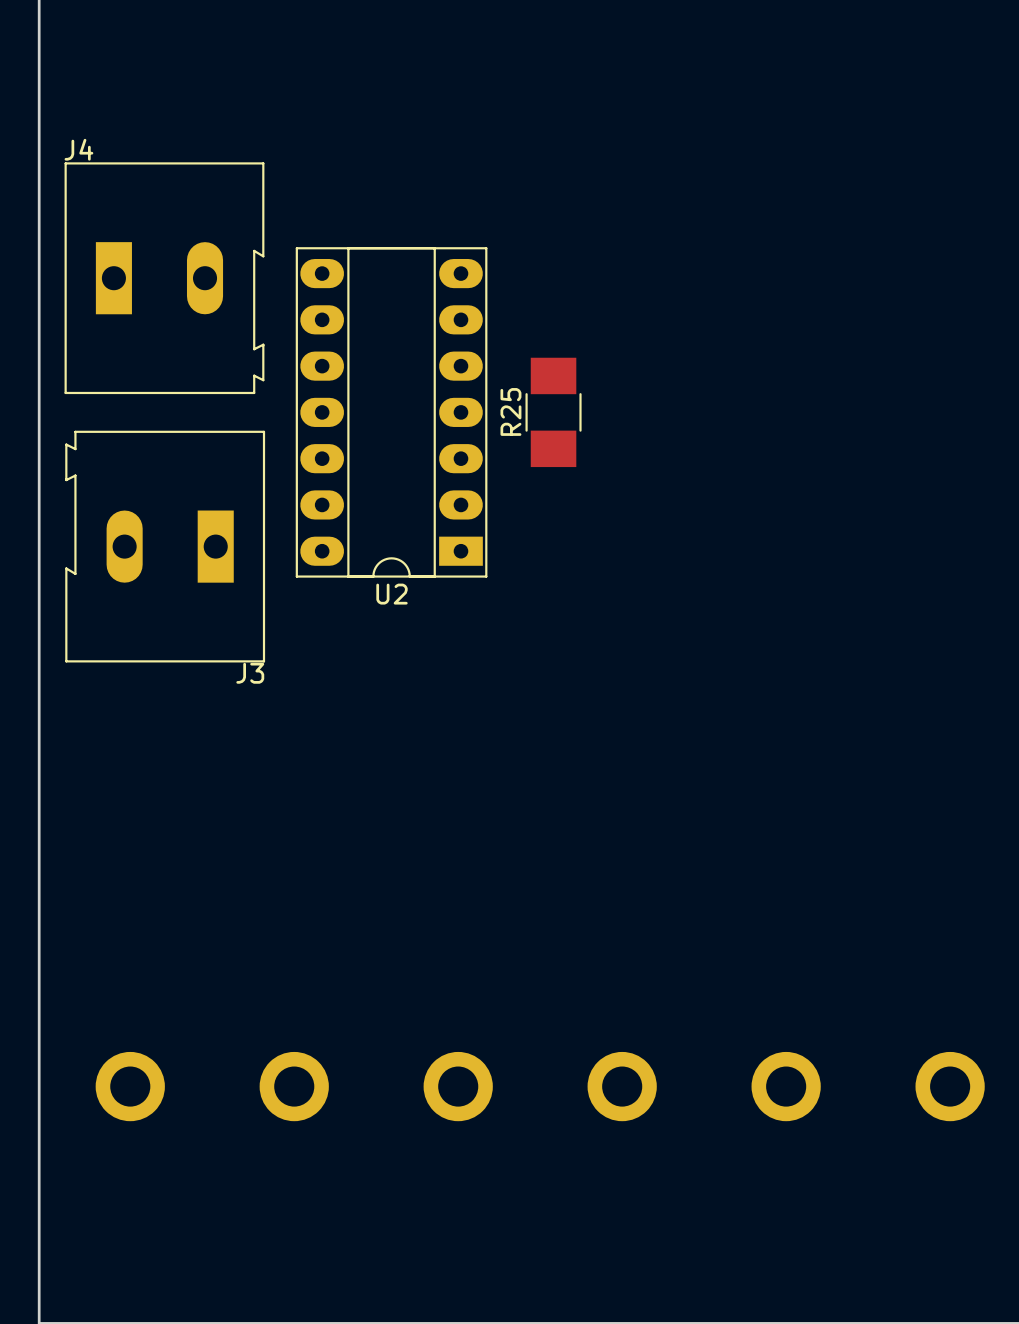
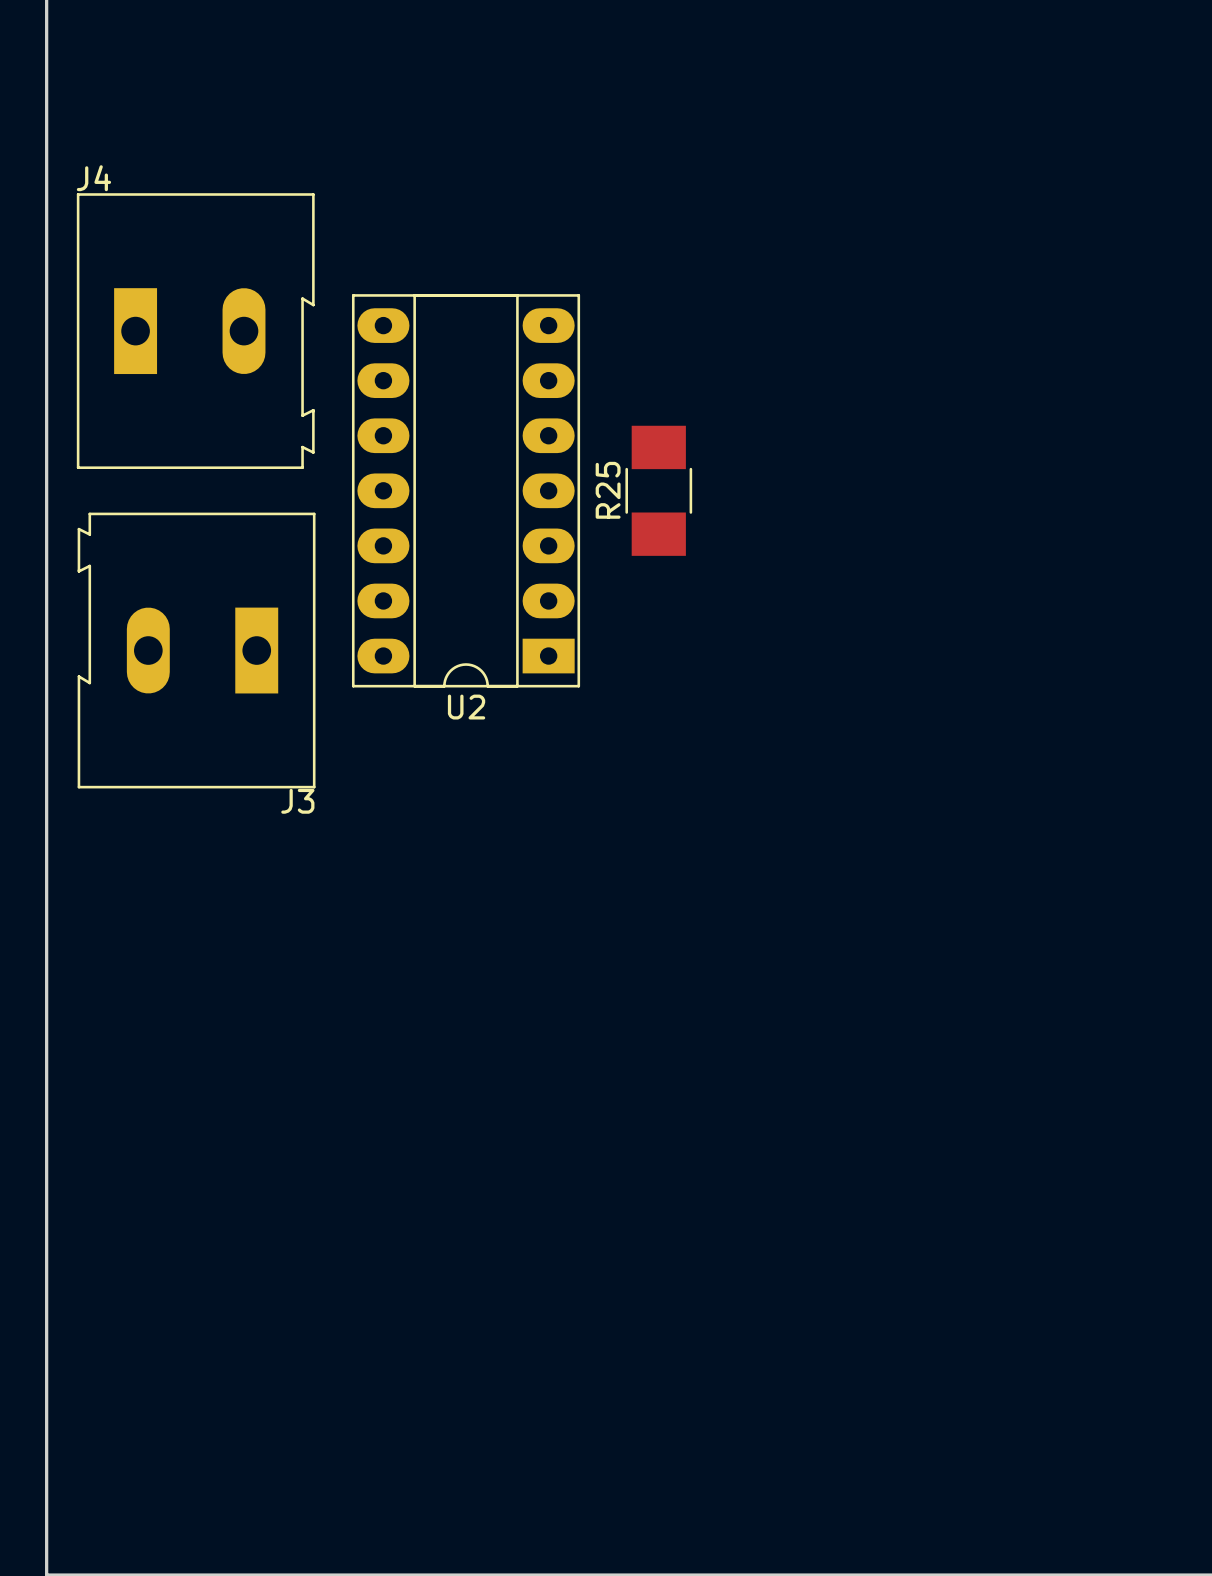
part: (130, 1086) -> none
part: (294, 1086) -> none
part: (458, 1086) -> none
part: (622, 1086) -> none
part: (786, 1086) -> none
part: (950, 1086) -> none

